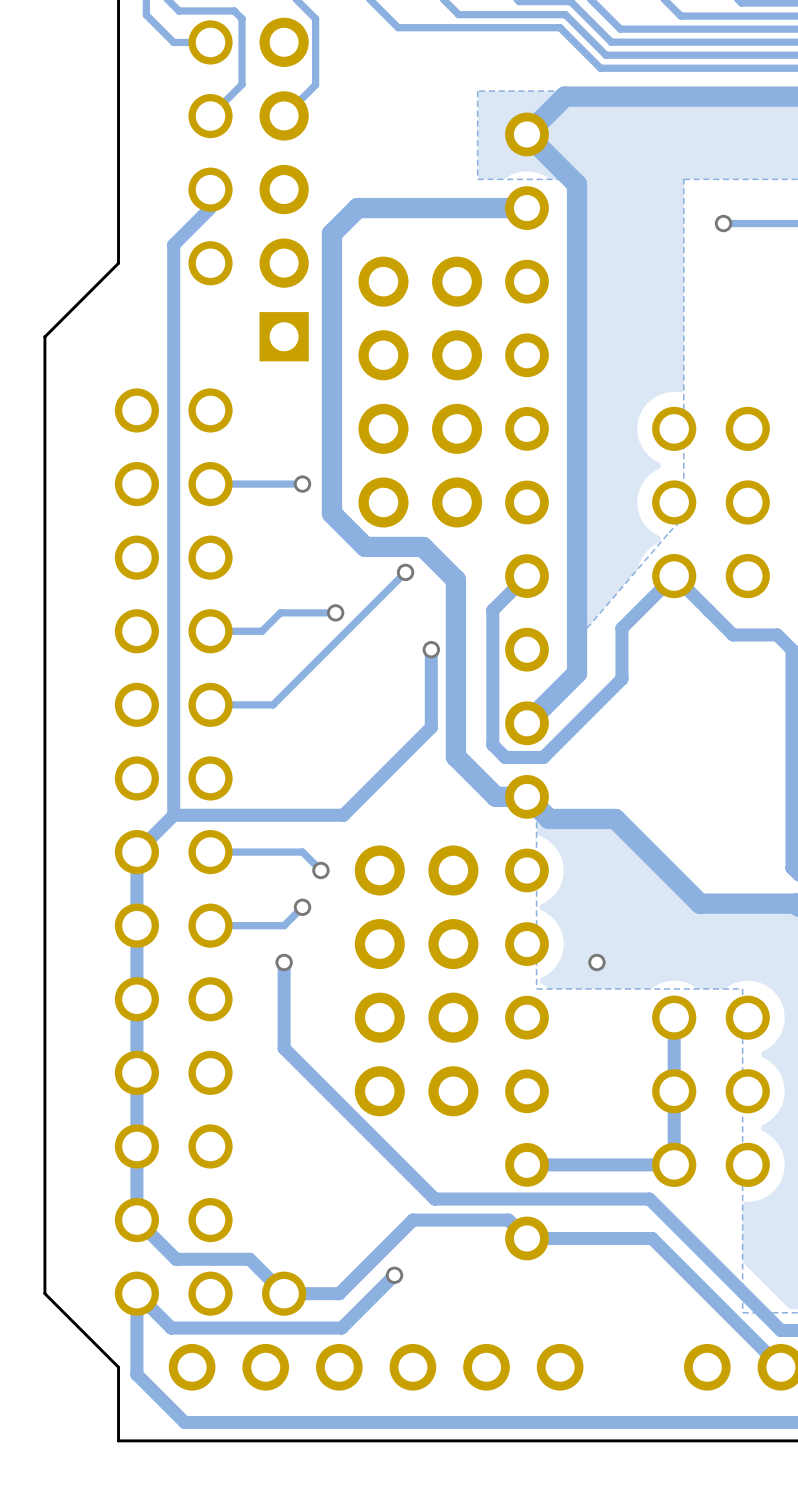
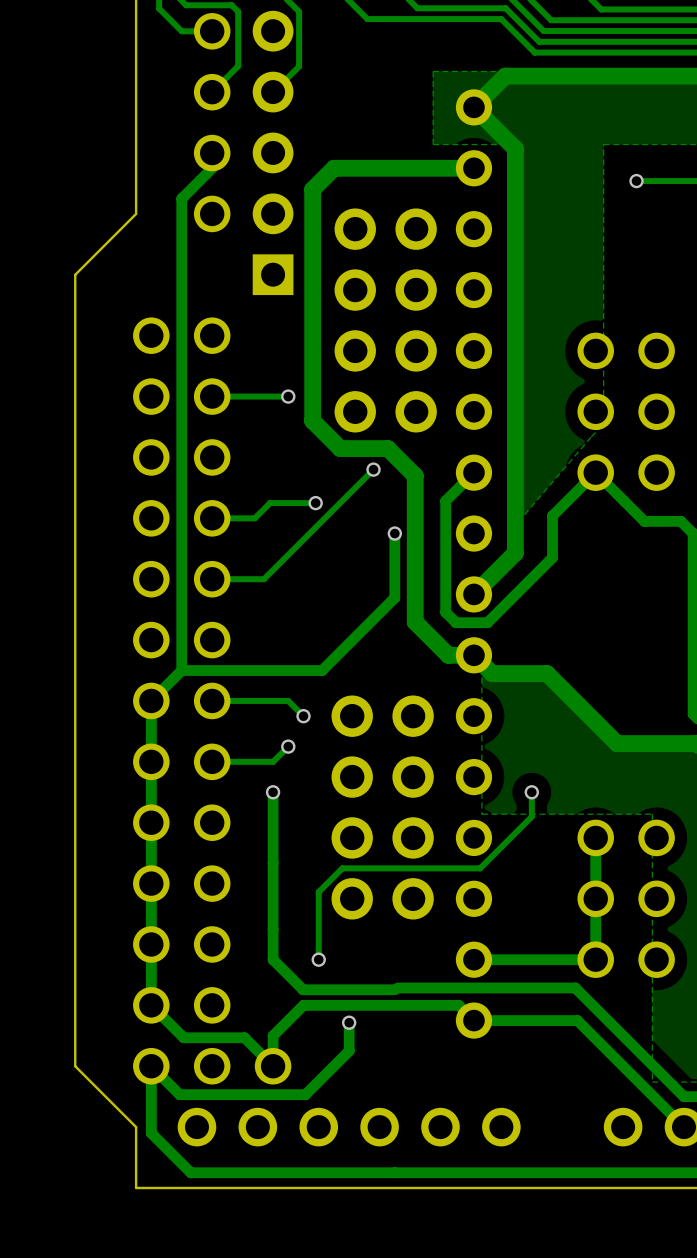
track: none -> (531, 792) (531, 816) (480, 868) (342, 868) (318, 892) (318, 959)
track: (284, 1048) (434, 1199) -> (273, 863) (273, 959) (303, 989) (394, 989)
via: none -> (318, 959)
track: (412, 1220) (339, 1293) (284, 1293) -> (379, 1005) (303, 1005) (273, 1035) (273, 1066)
track: (394, 1275) (341, 1328) (323, 1328) -> (349, 1022) (349, 1051) (305, 1094)
via position: (394, 1275) -> (349, 1022)

